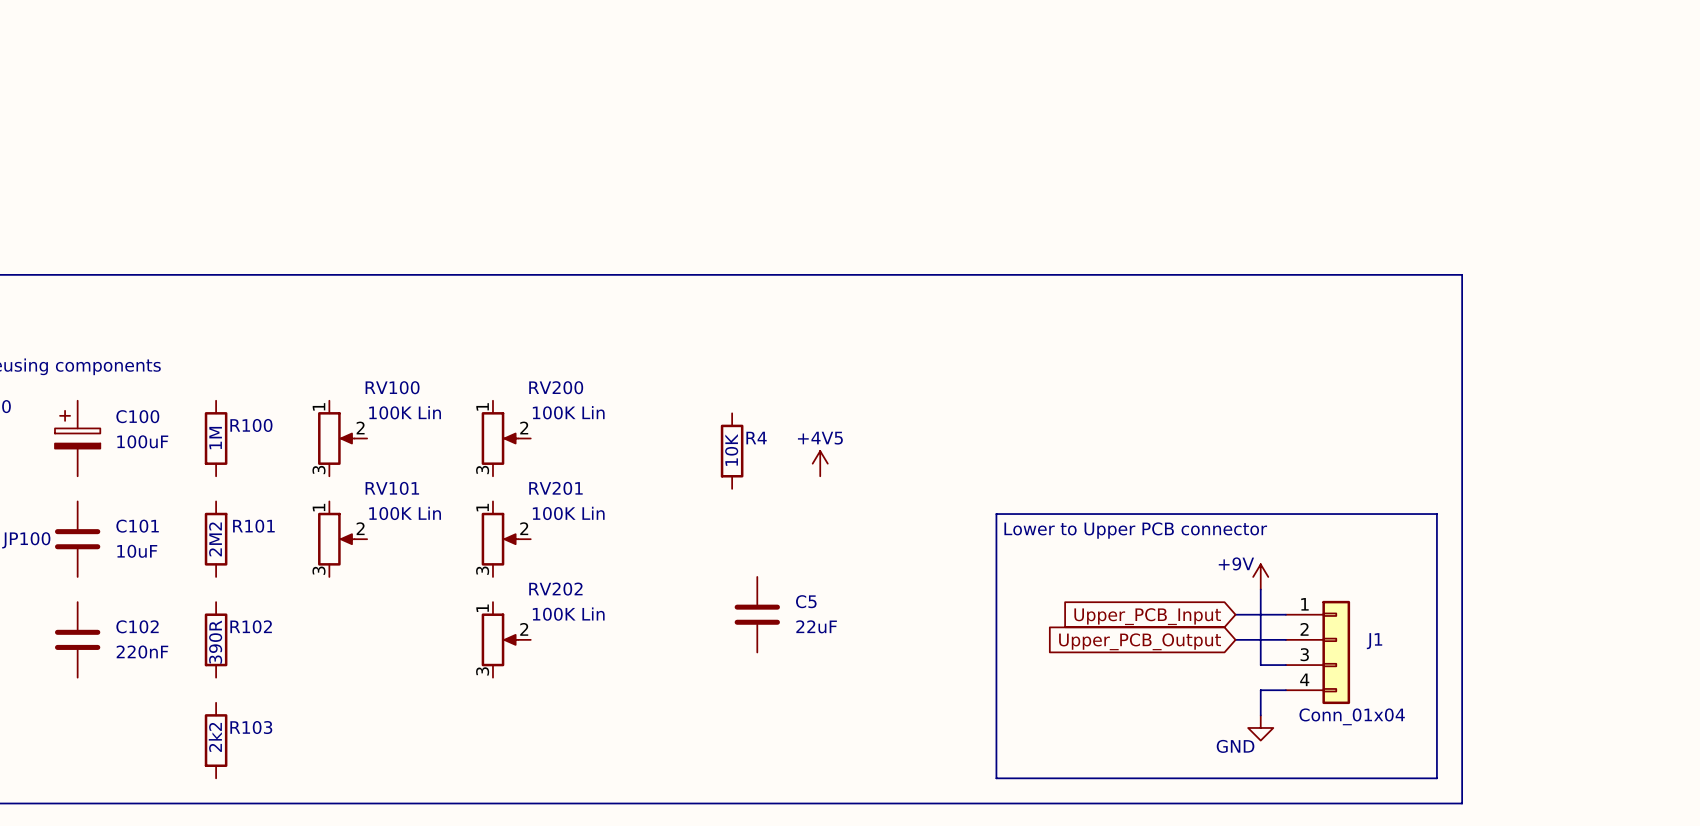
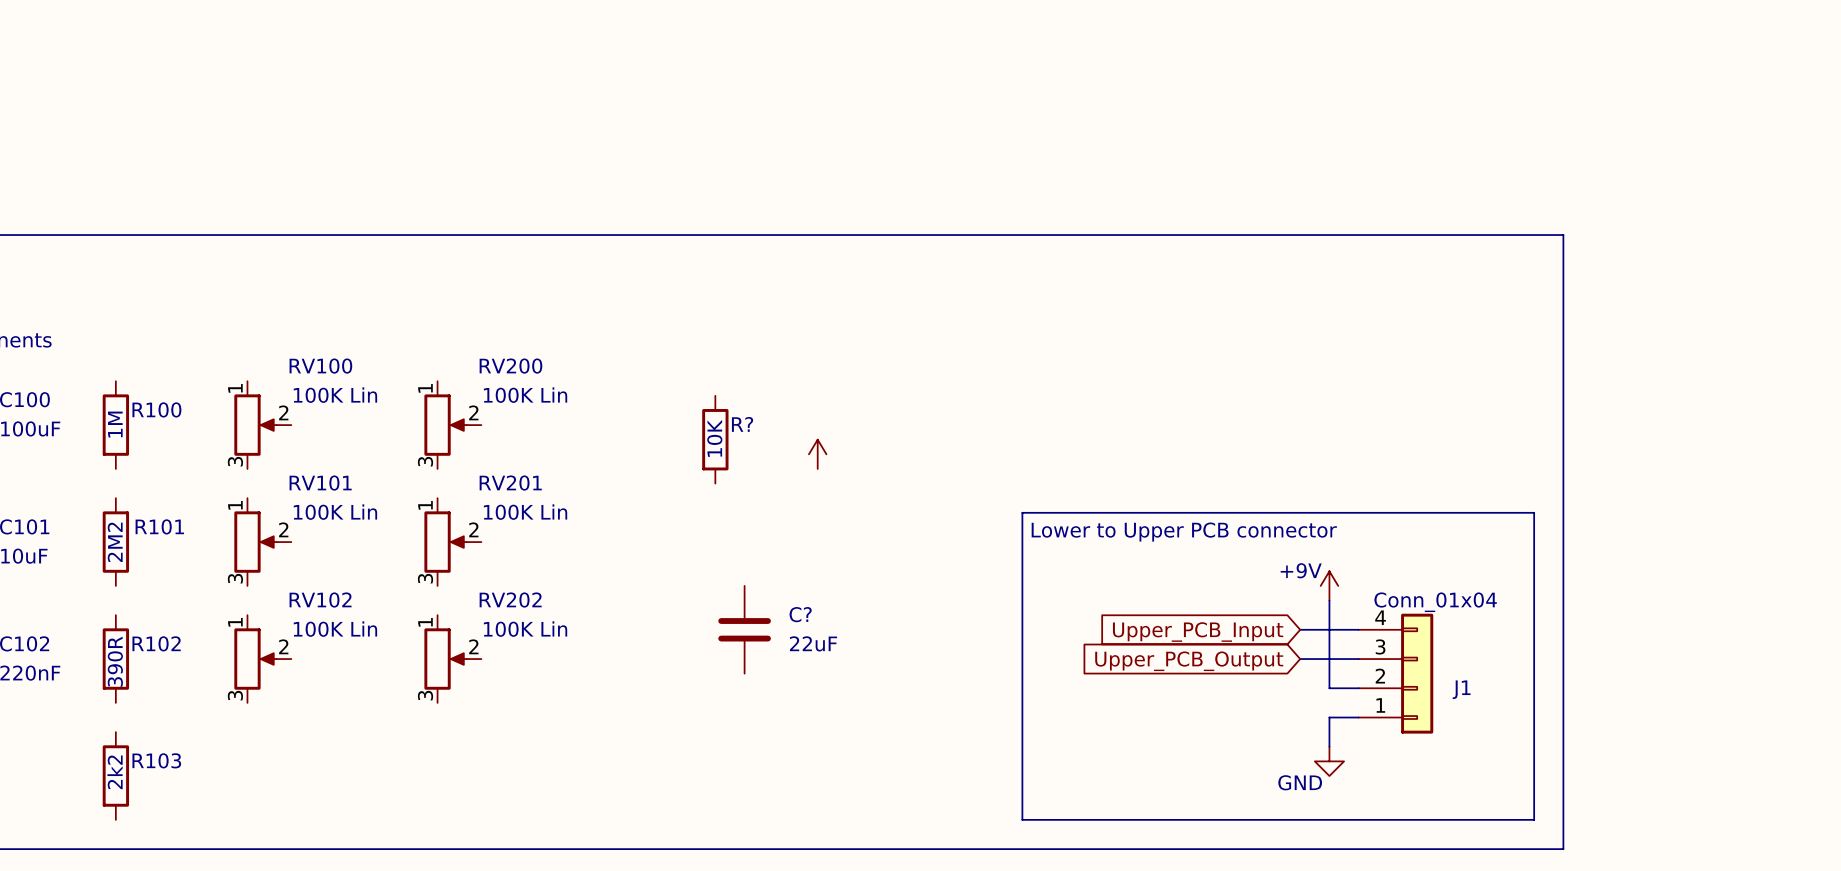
R4 name: R4 (756, 438) -> R? (742, 424)
power symbol text: +4V5 (820, 438) -> none
C5 name: C5 (806, 601) -> C? (800, 614)
RV102: none -> 100K Lin (262, 659)
J1 flip: as is (1336, 652) -> up-down (1417, 673)

